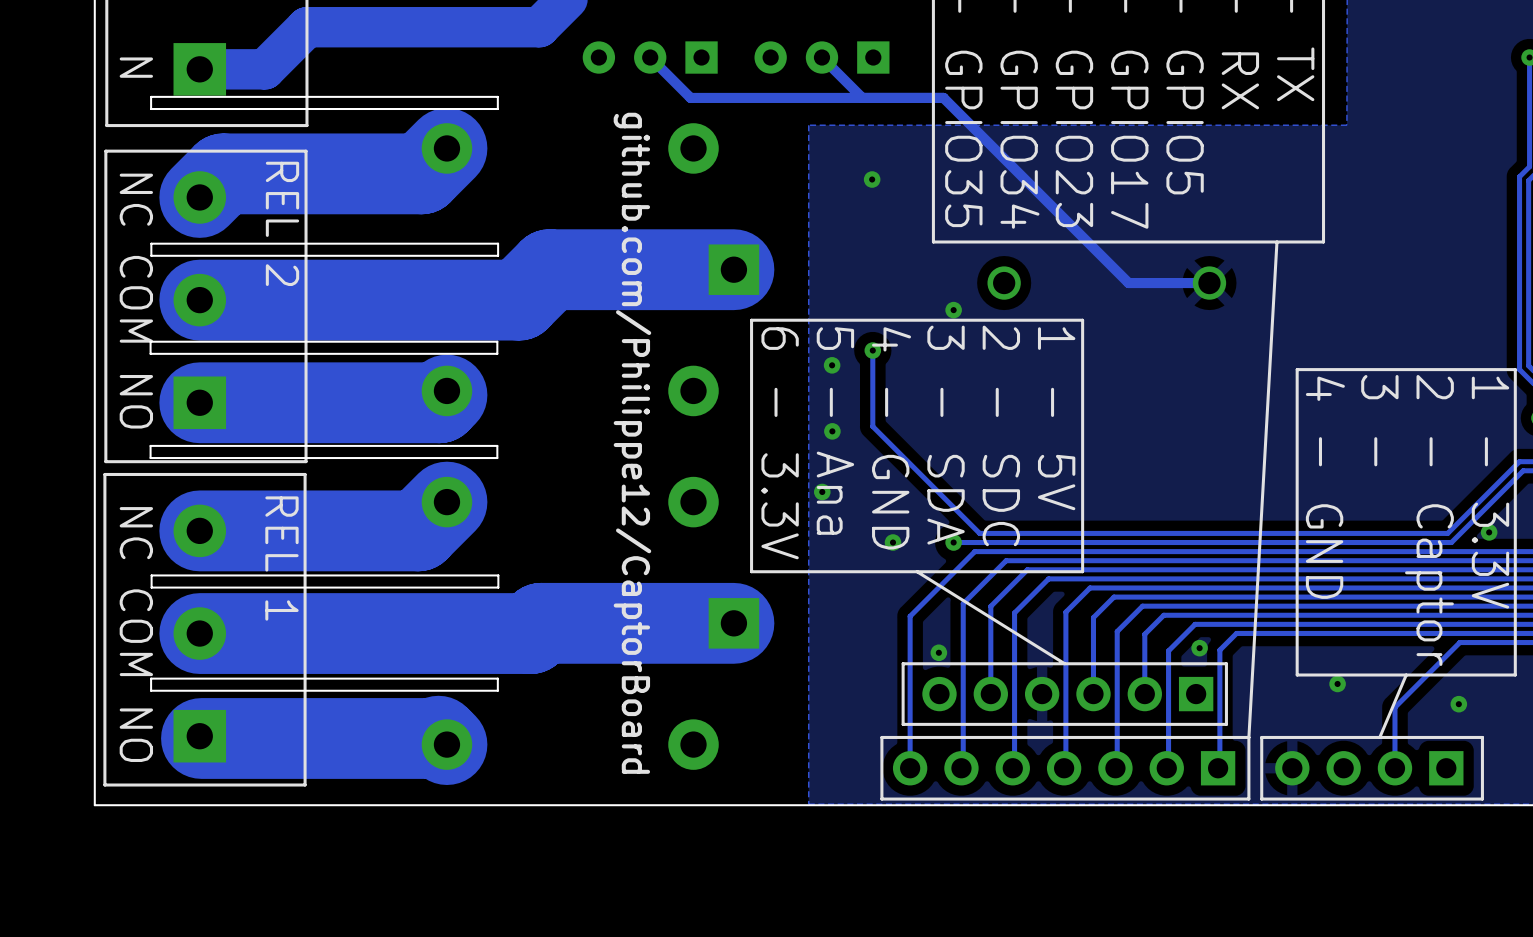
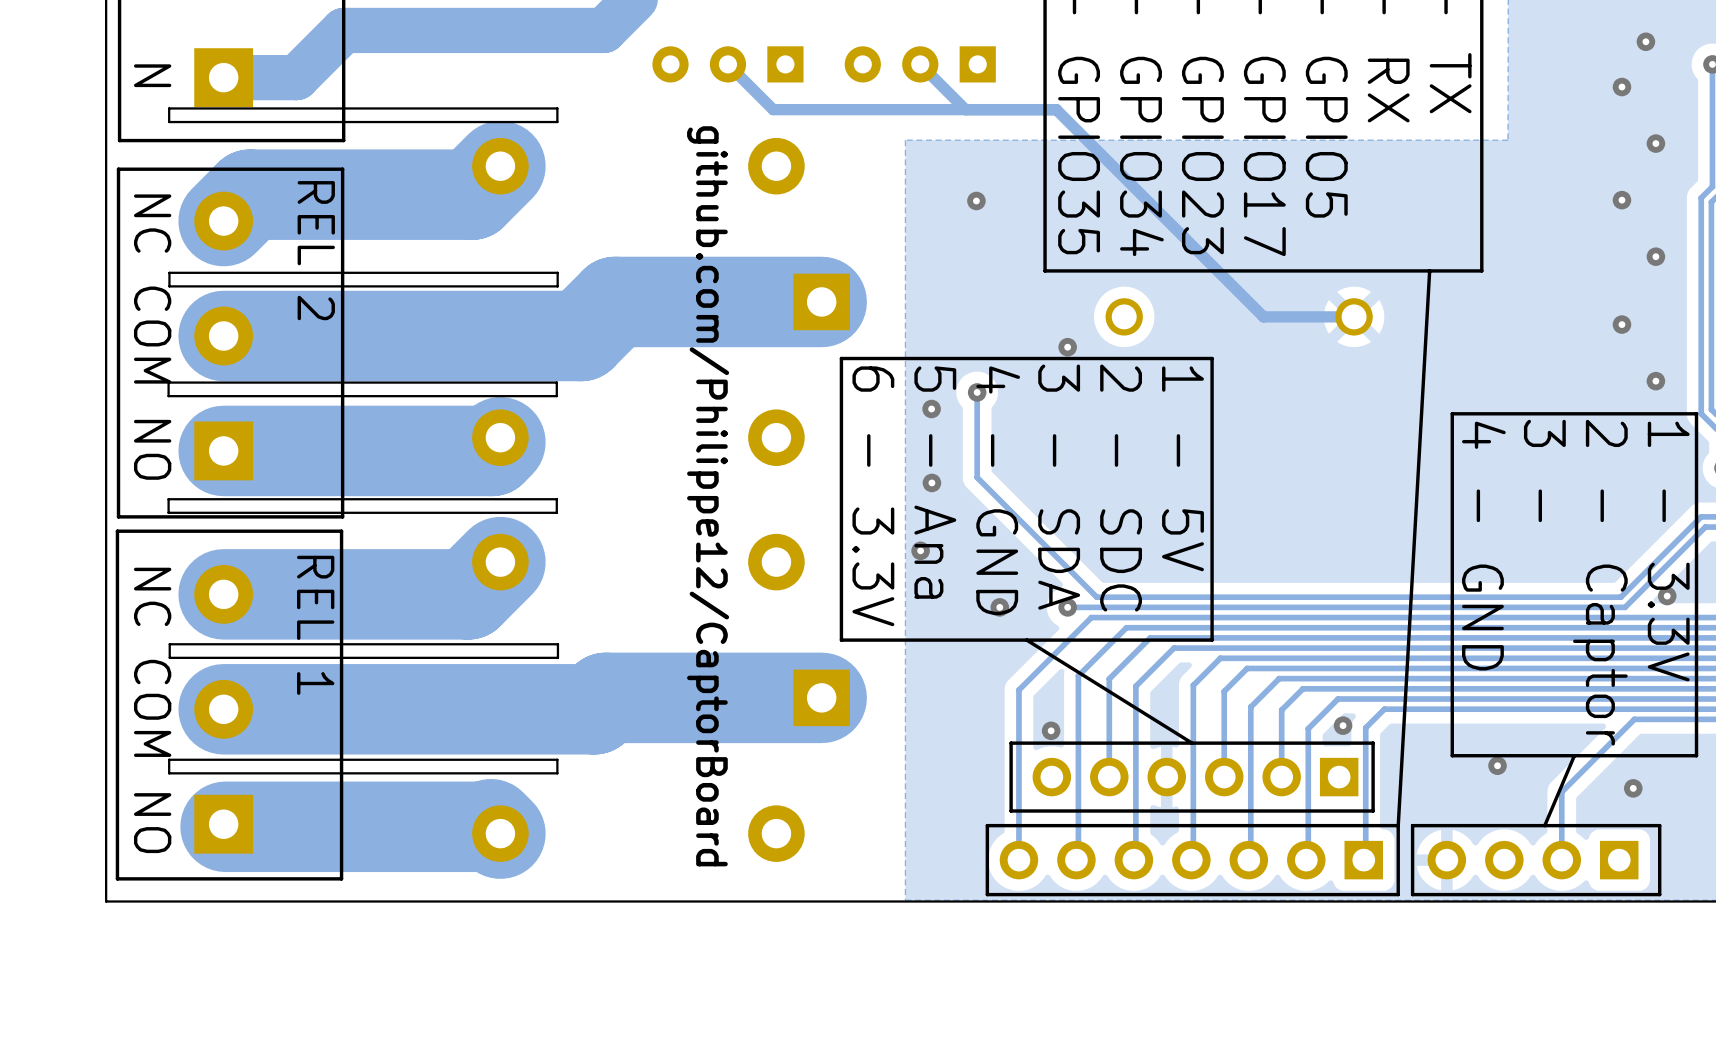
via: none -> (1645, 41)
via: none -> (1621, 87)
via: none -> (1655, 143)
via: none -> (1621, 200)
via: none -> (1655, 256)
via: none -> (1621, 324)
via: none -> (1655, 381)

